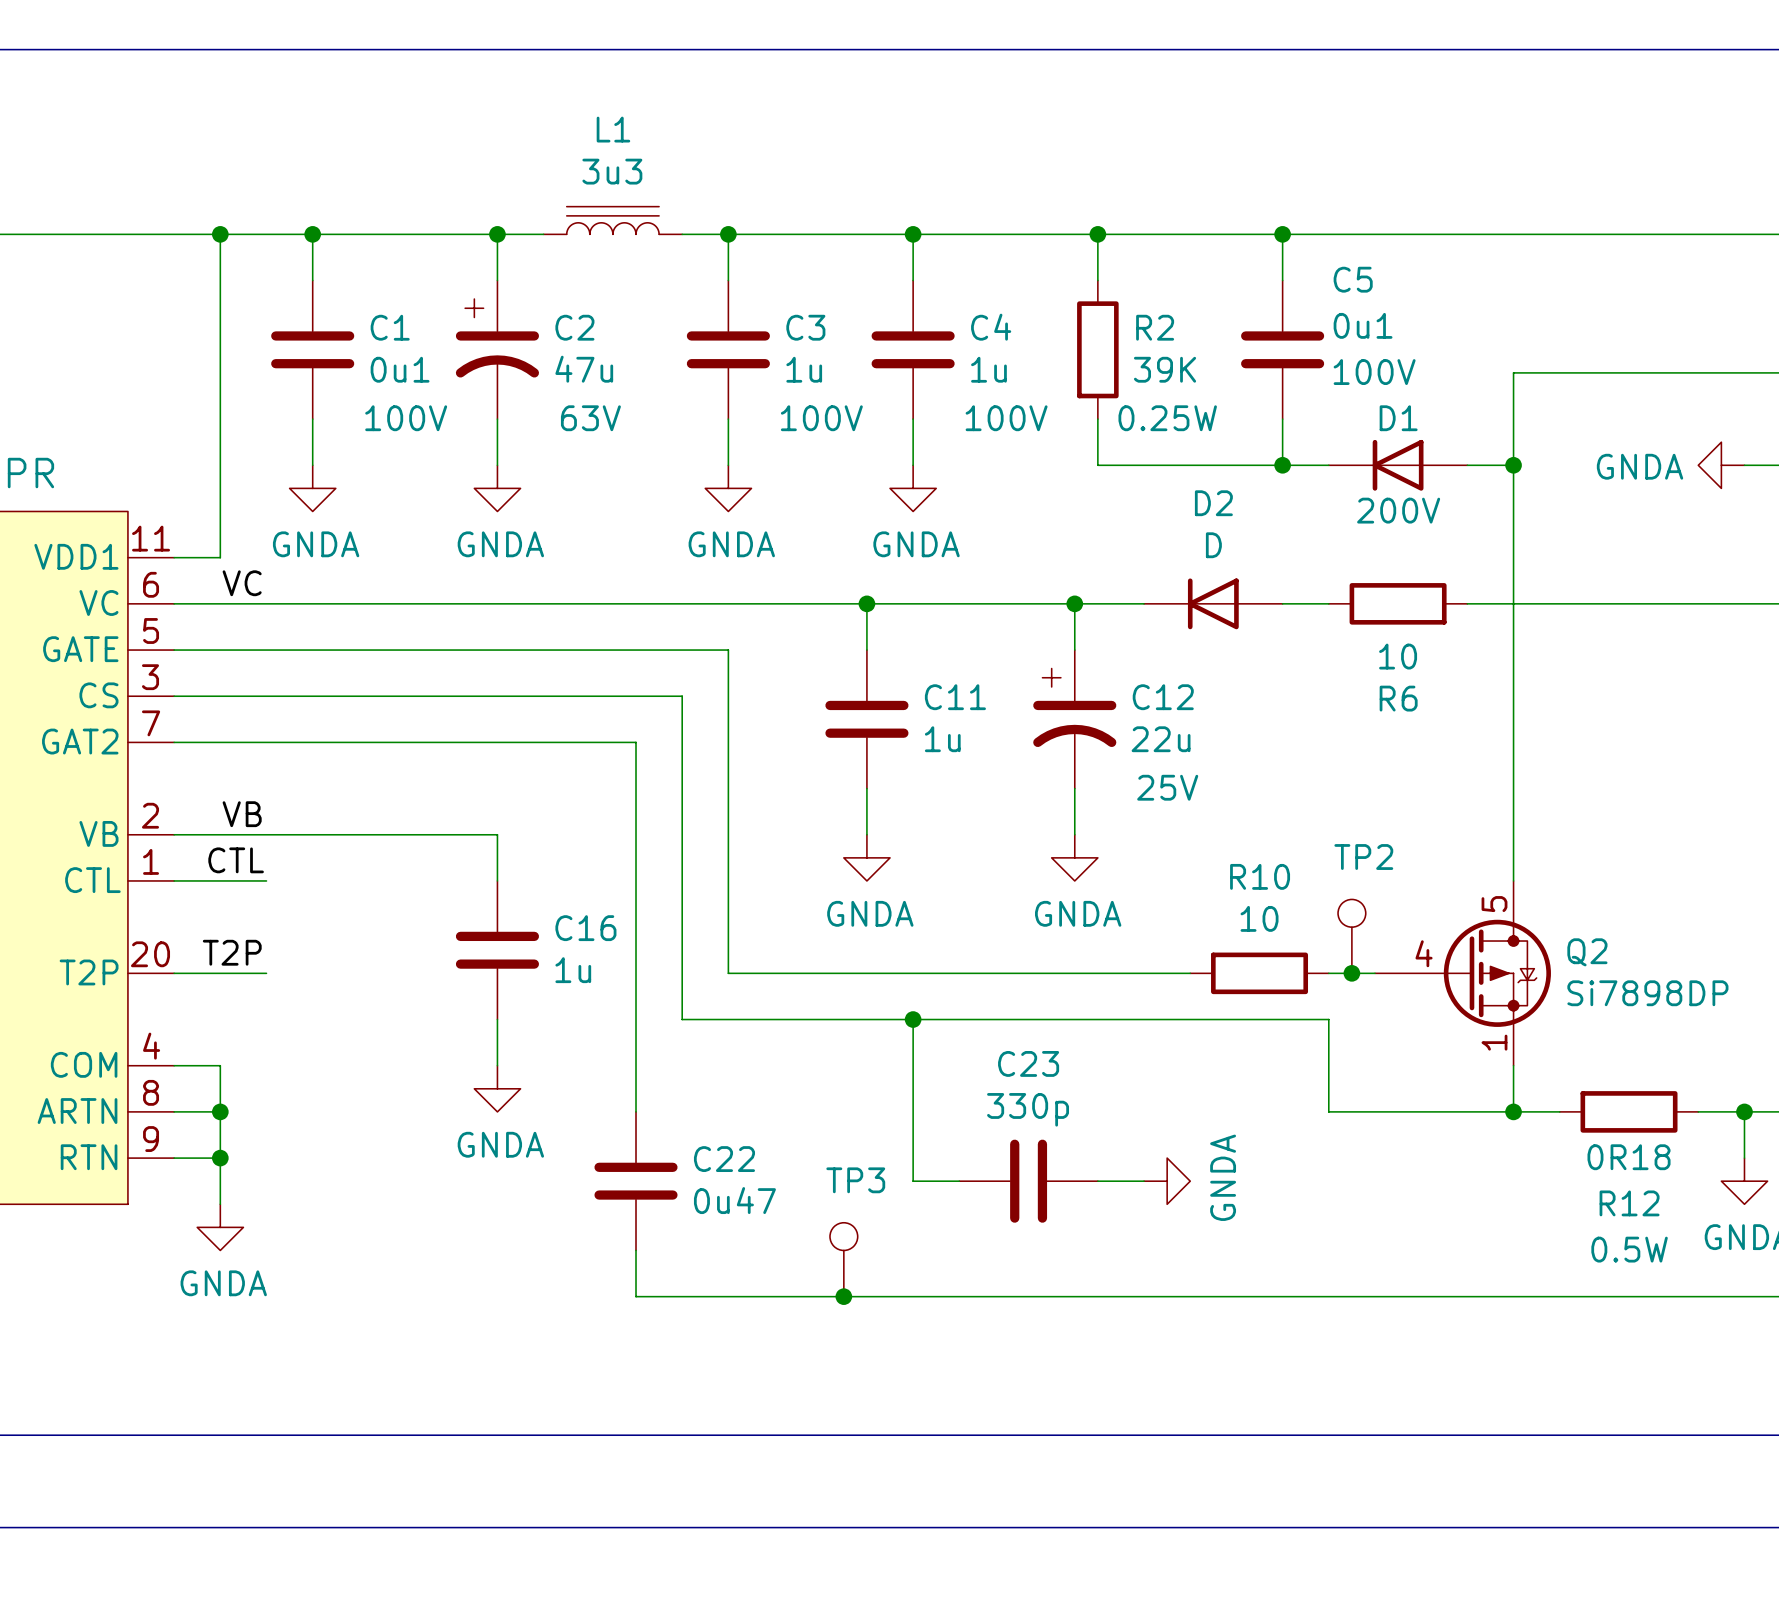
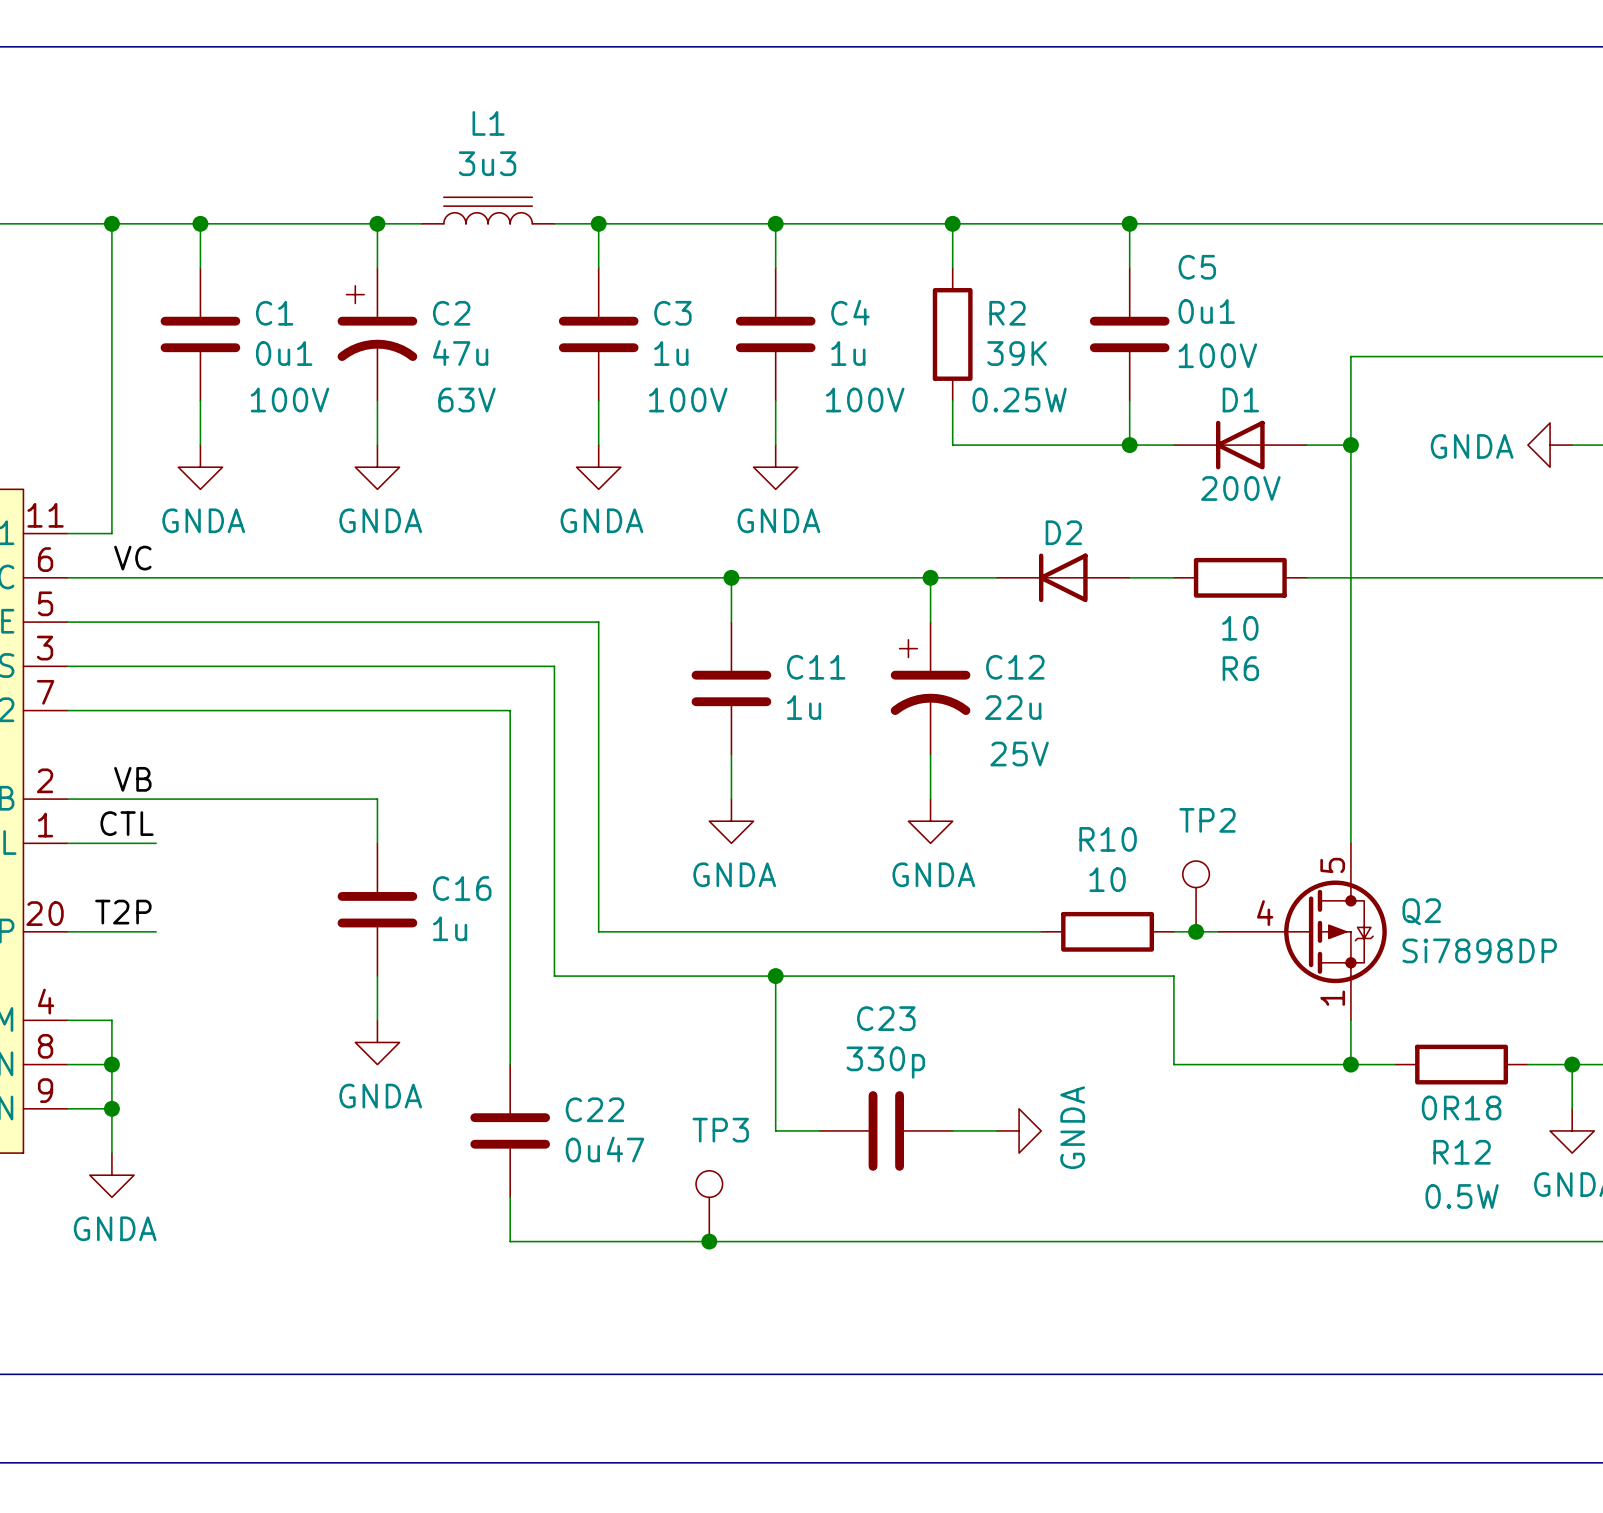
D2 name position: D2 (1213, 503) -> D2 (1063, 532)
D2 value: D (1213, 545) -> none

